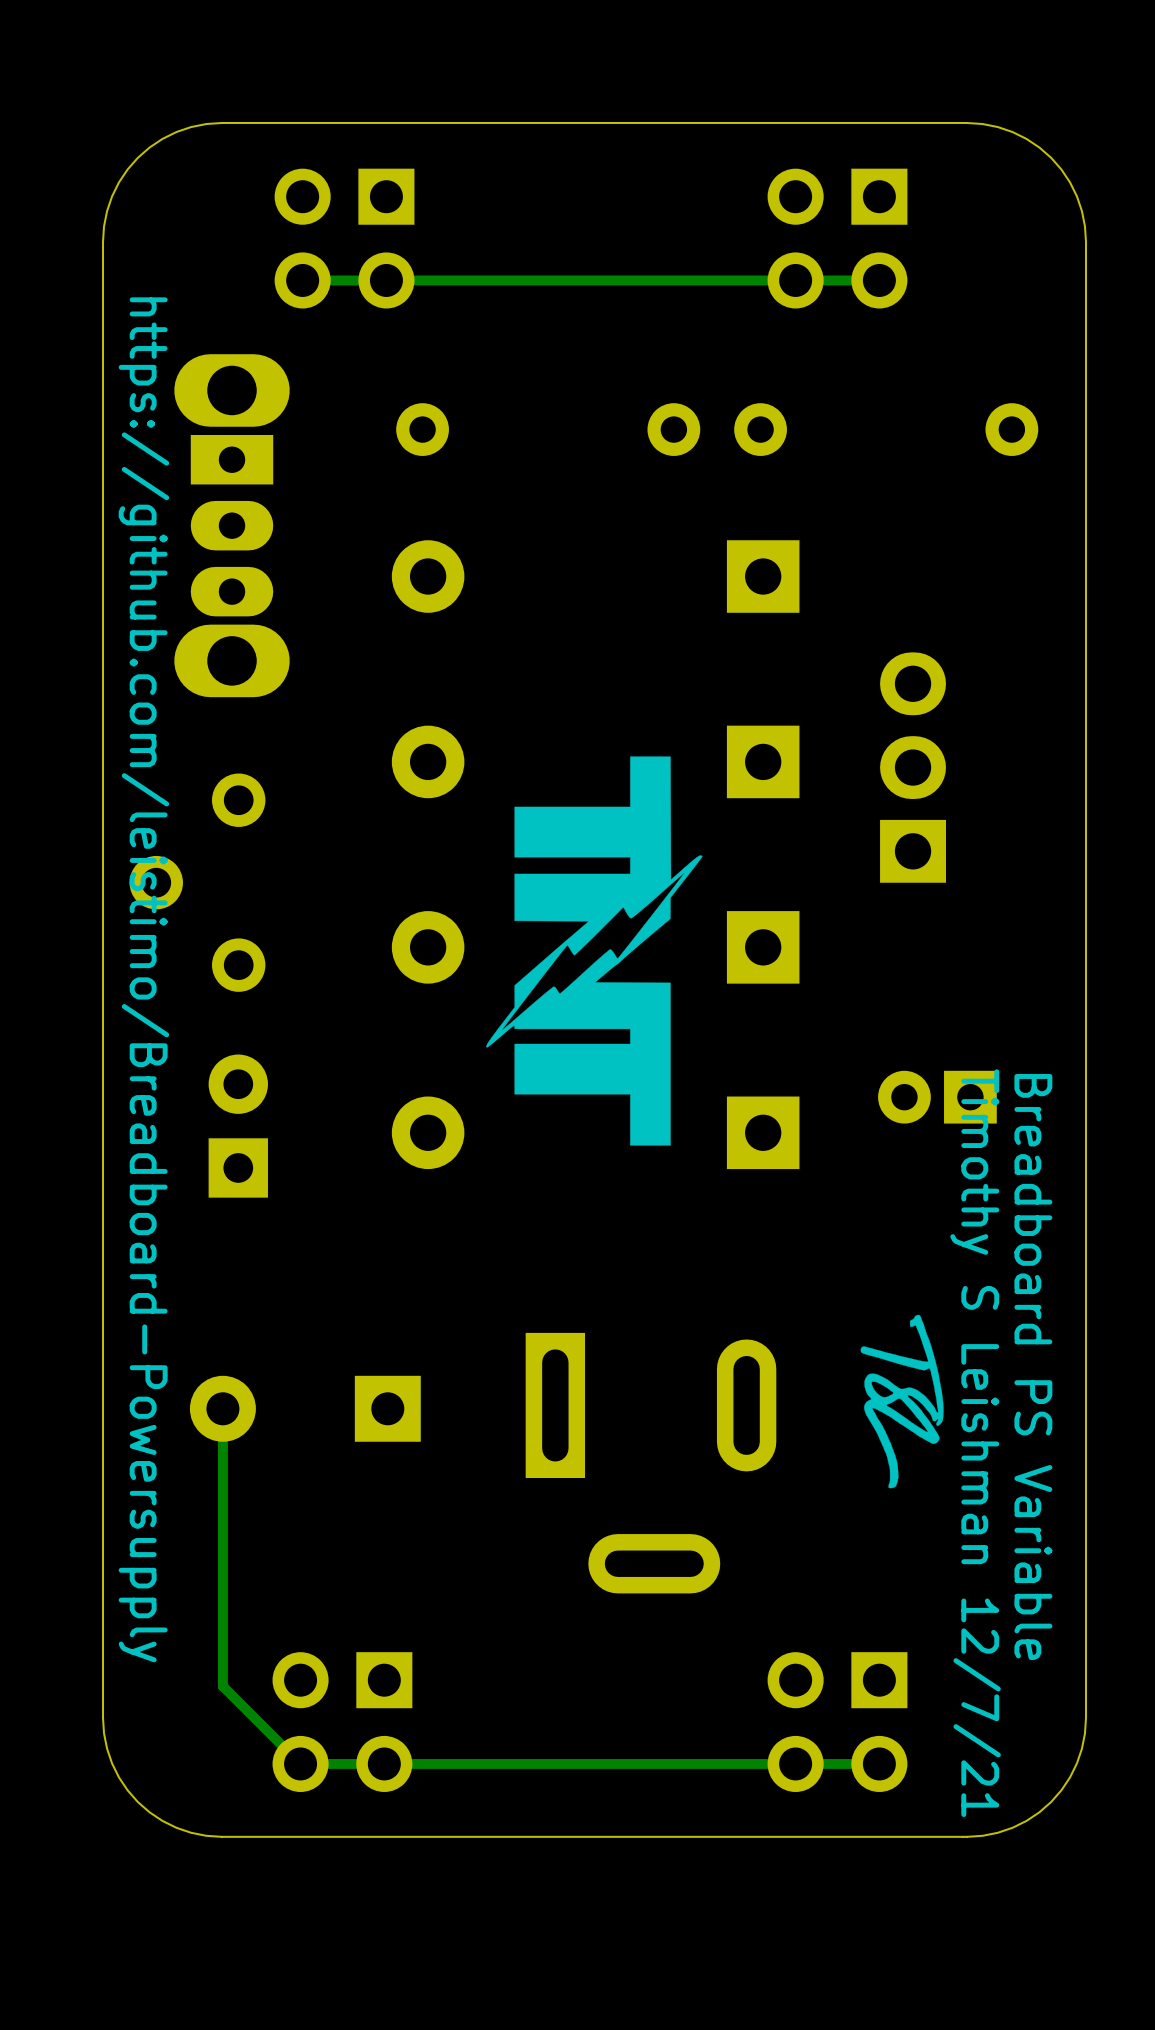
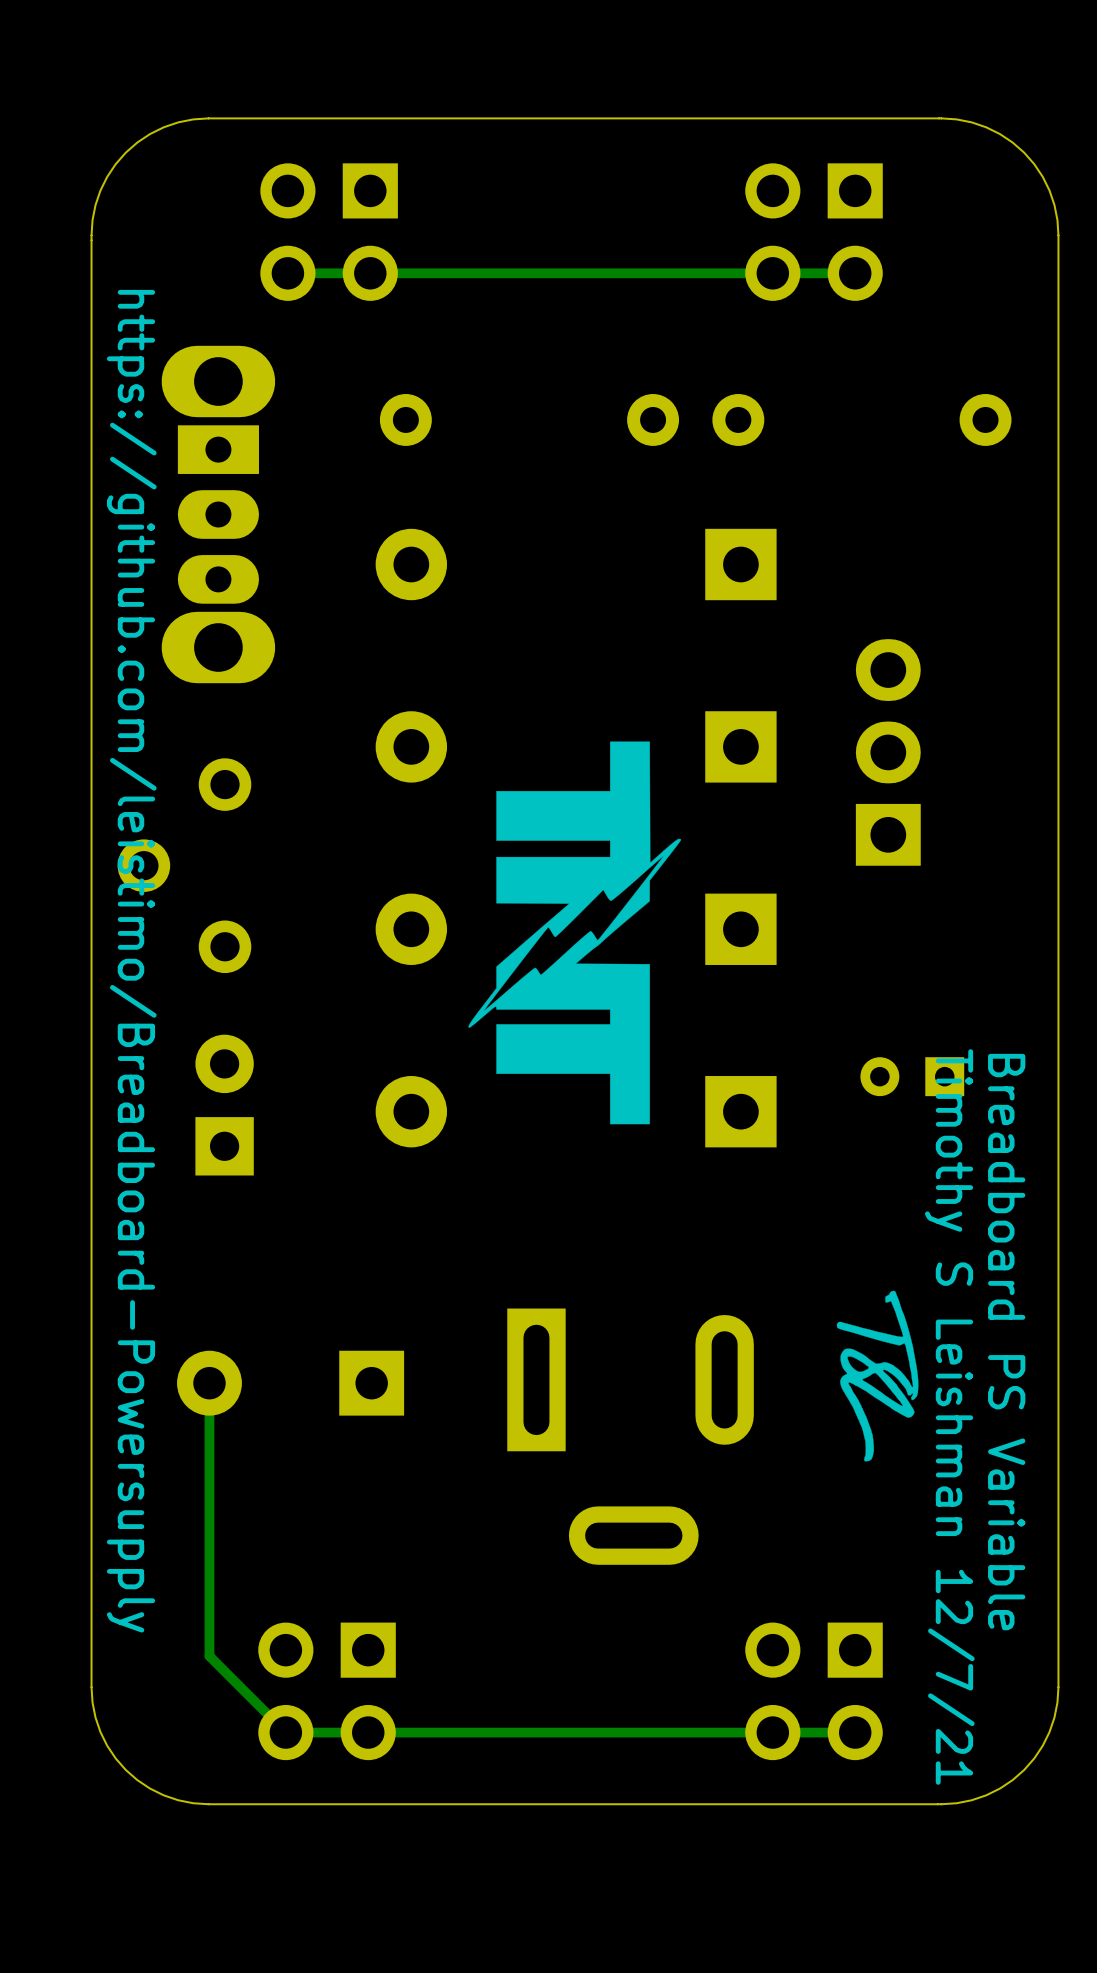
part footprint: [878, 1070, 997, 1124] -> [860, 1057, 965, 1097]

